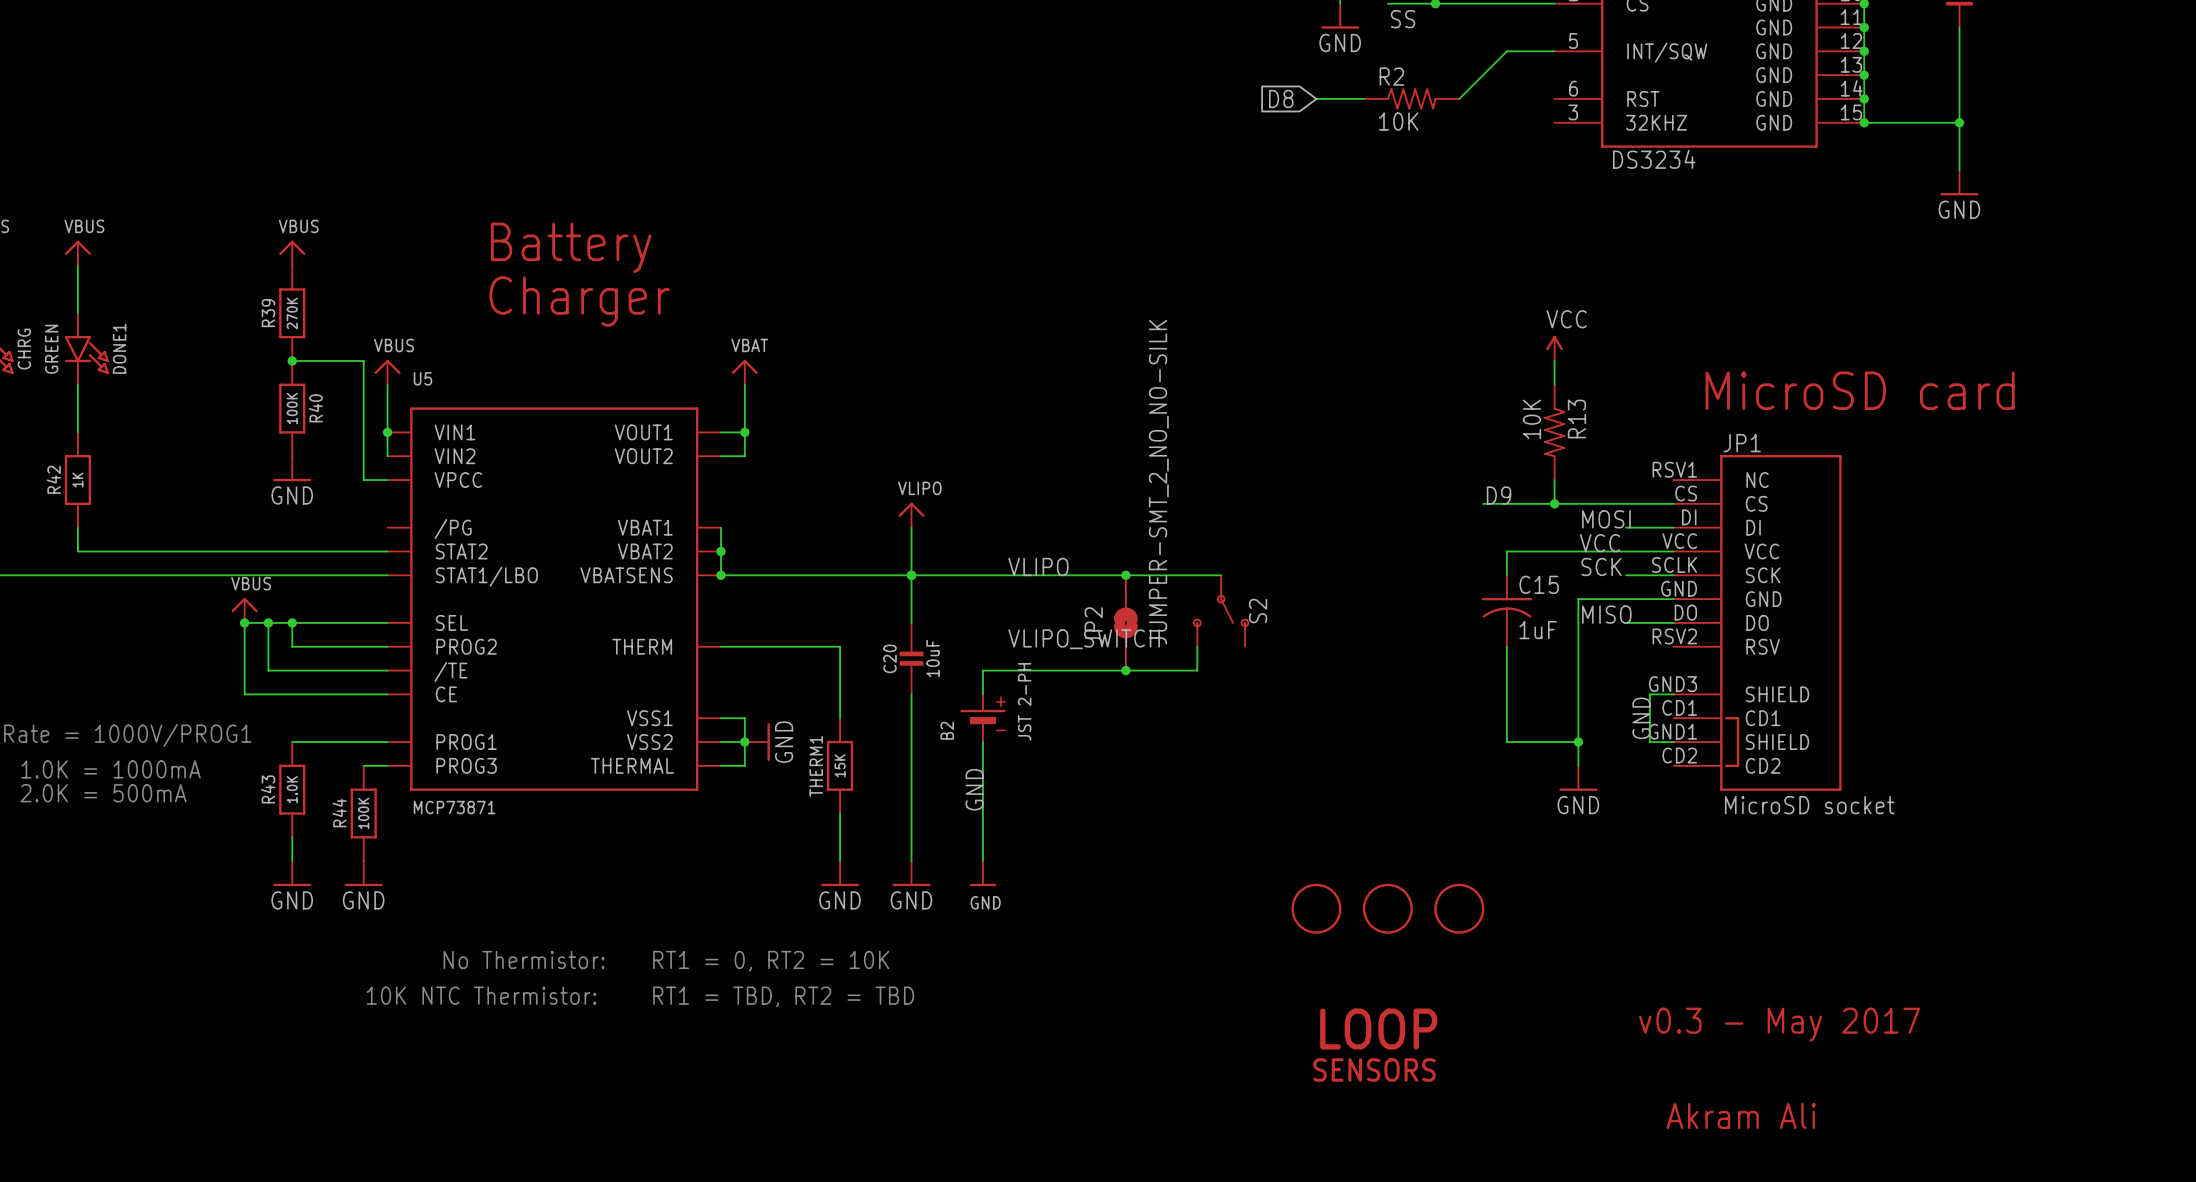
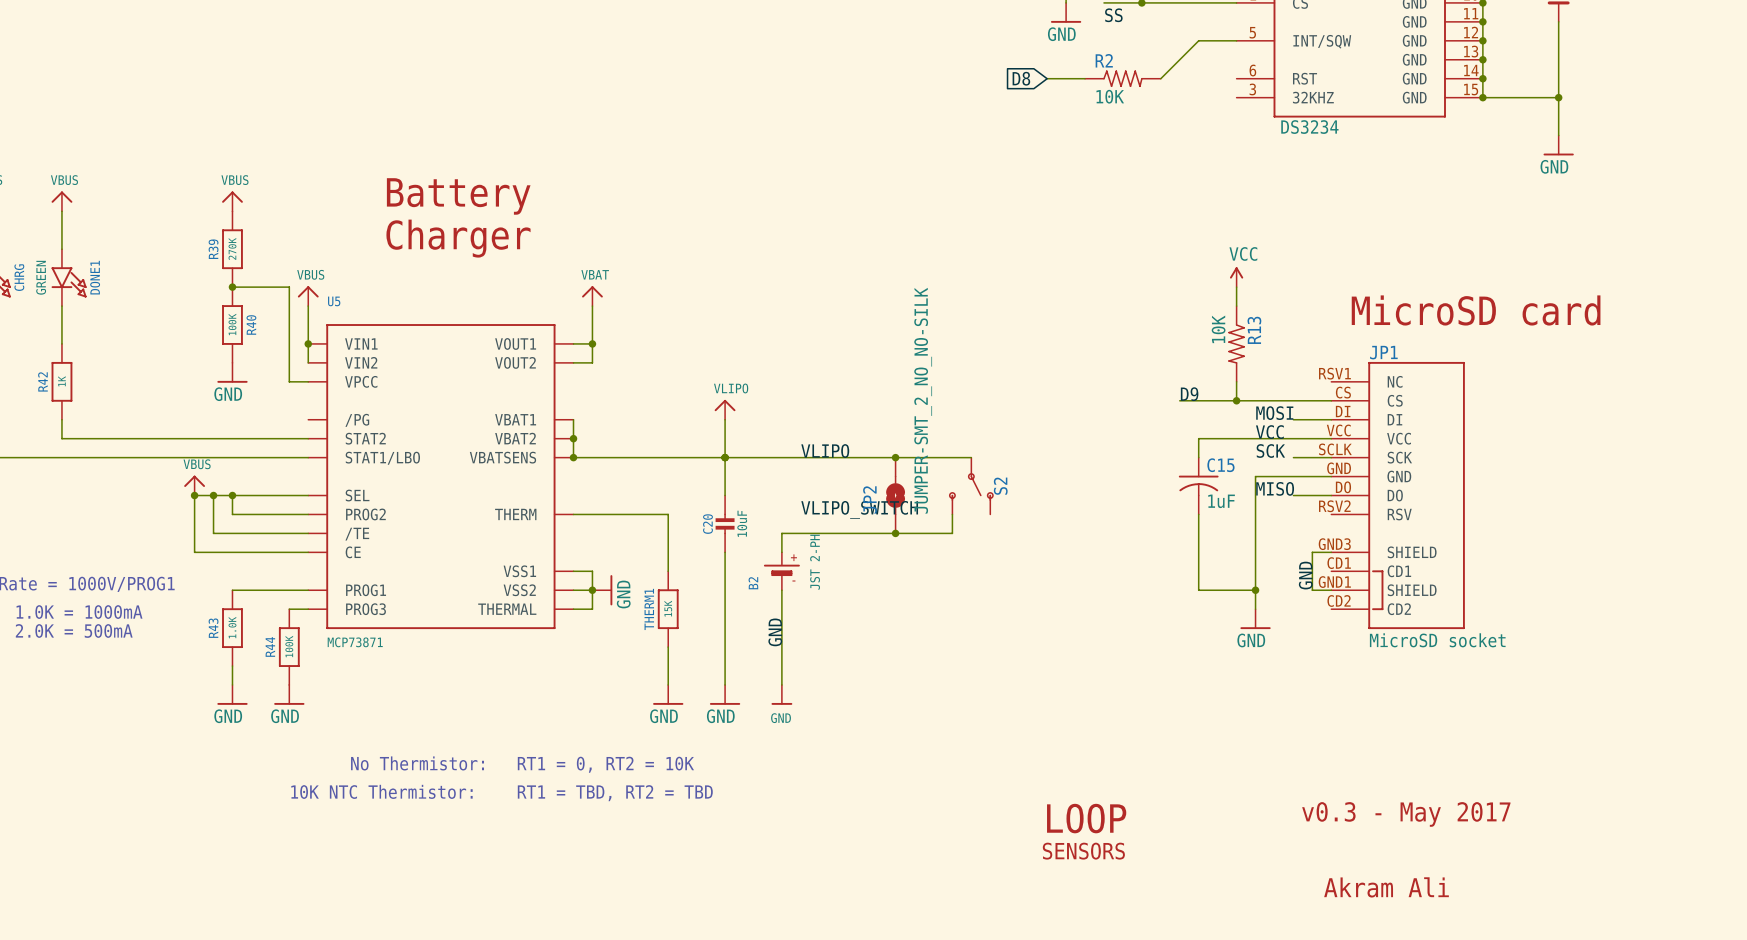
part: (1316, 908) -> none
part: (1387, 908) -> none
part: (1459, 908) -> none

